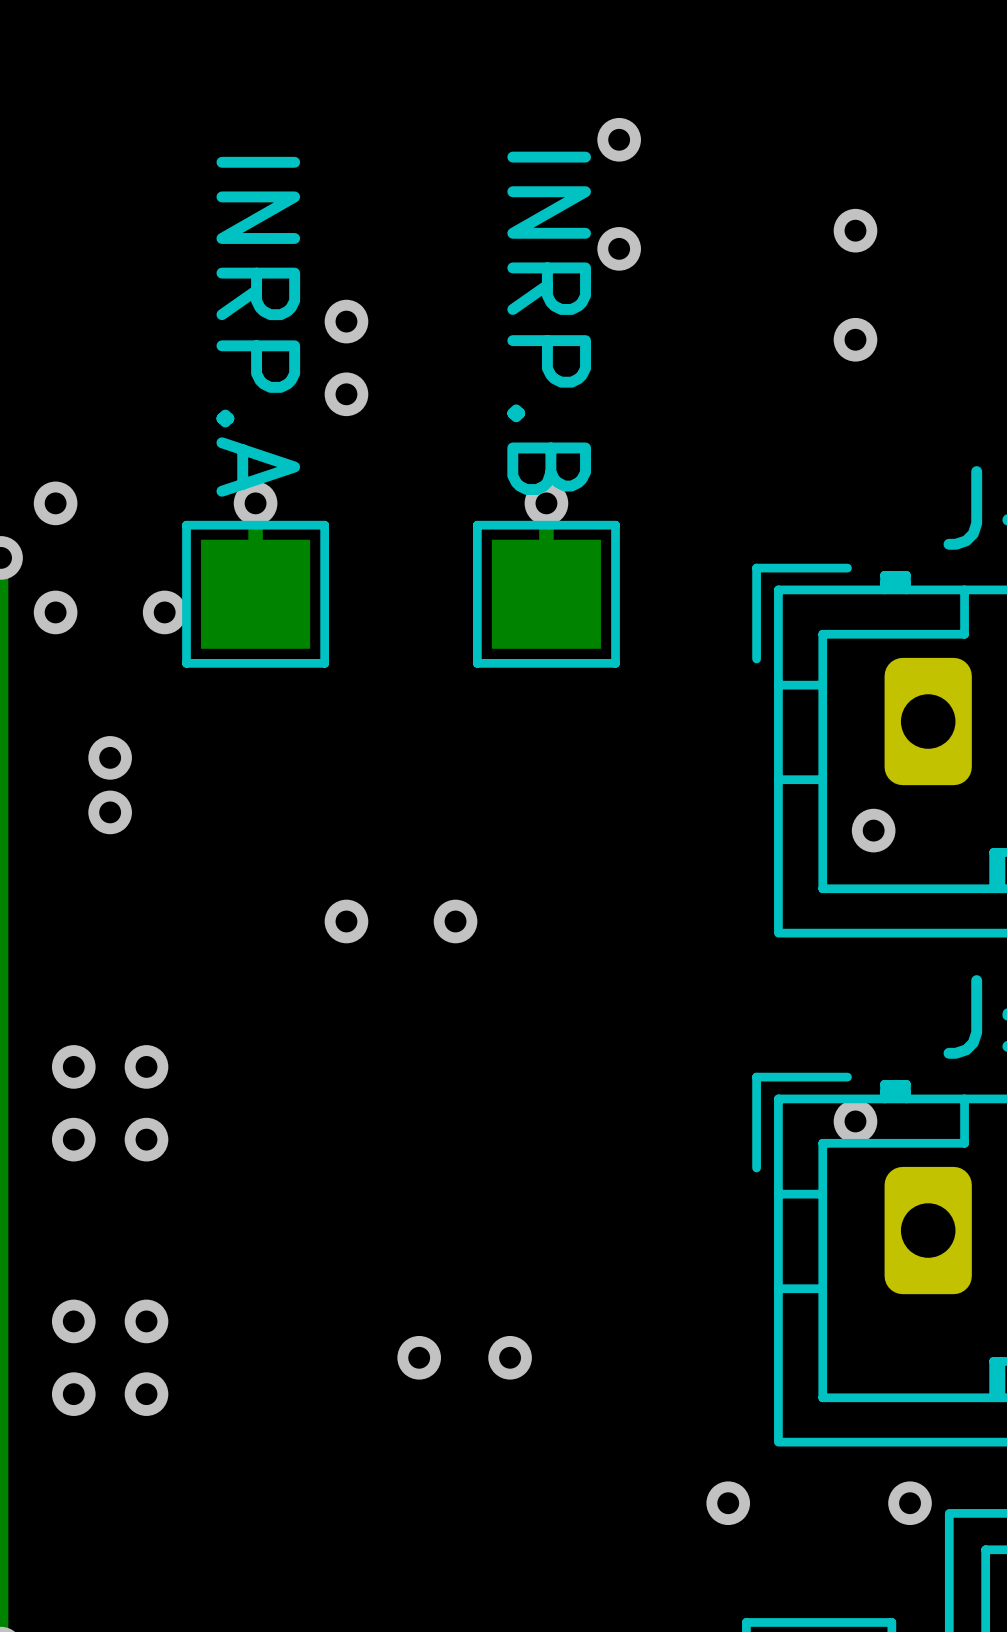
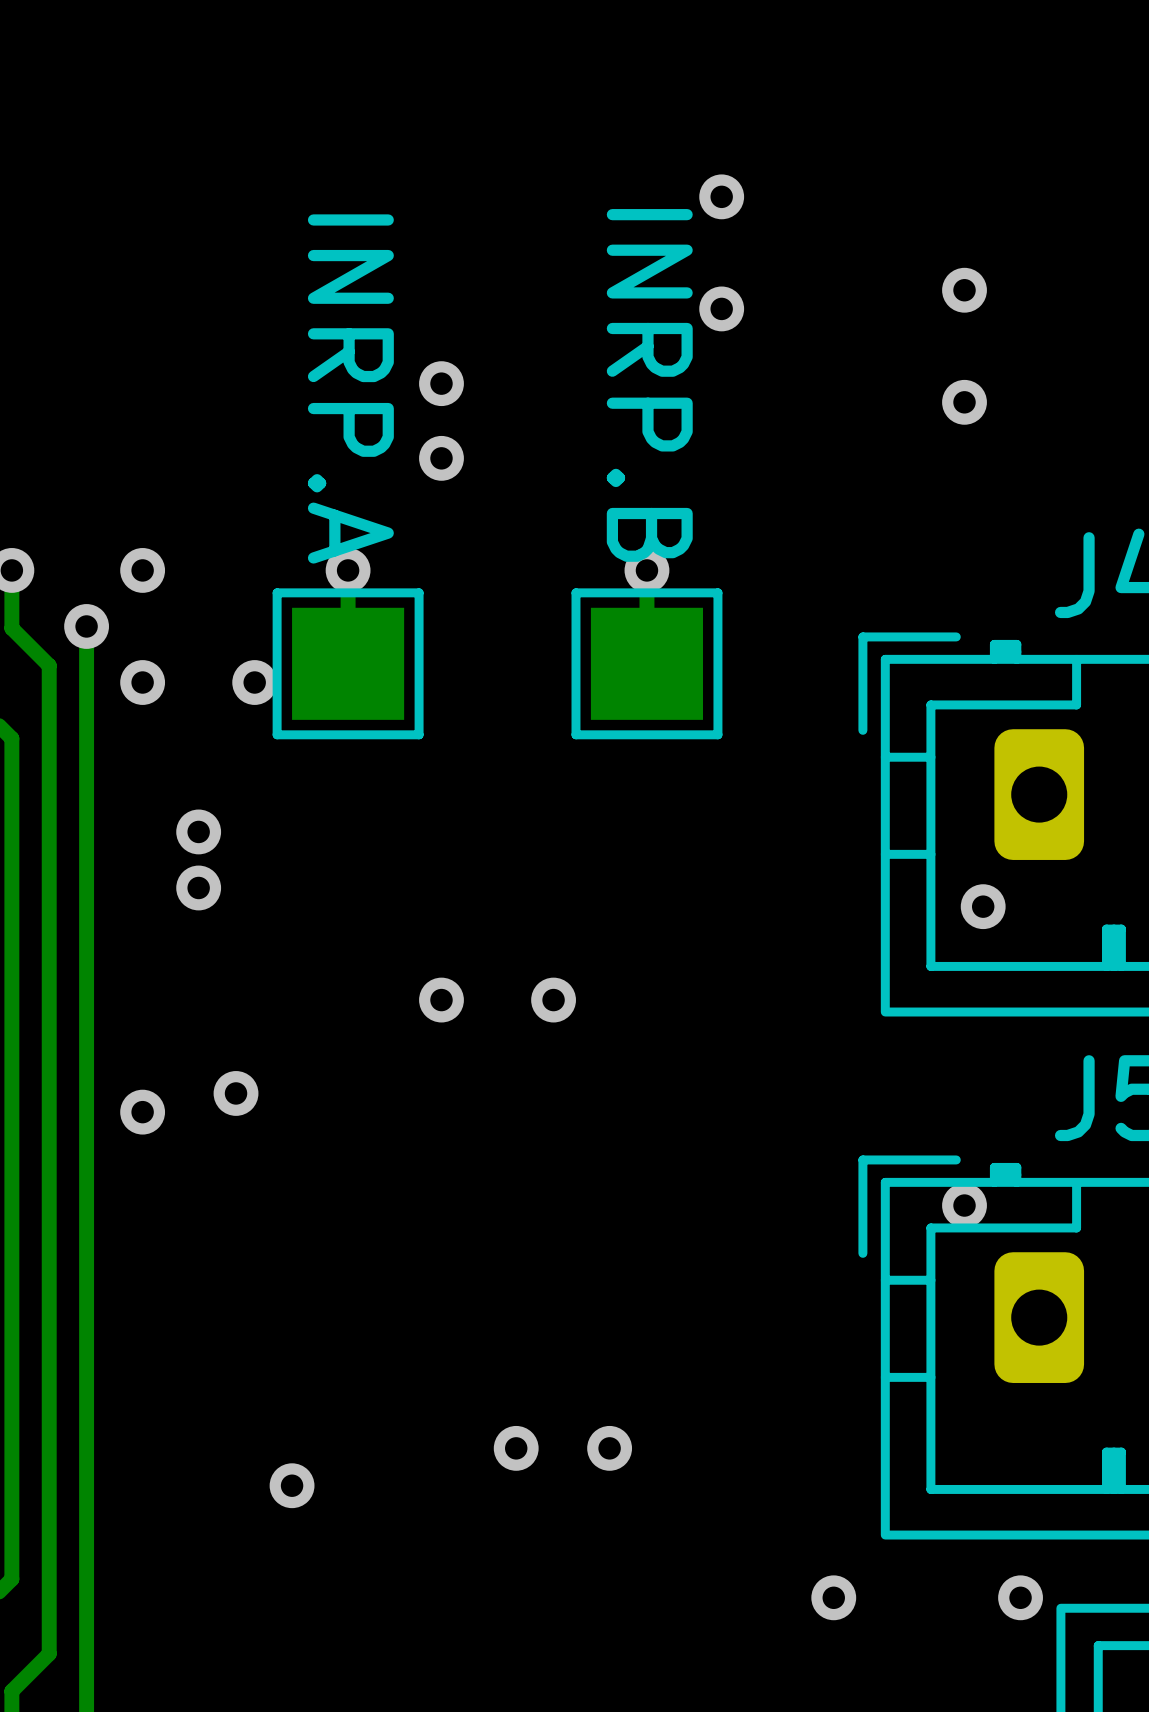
via: none -> (236, 1093)
via position: (73, 1066) -> (142, 1112)
via: (146, 1066) -> none
via: (73, 1139) -> none
via: (146, 1139) -> none
via: (73, 1321) -> none
via: (146, 1321) -> none
via: (73, 1394) -> none
via: (146, 1394) -> none
via: none -> (292, 1485)

